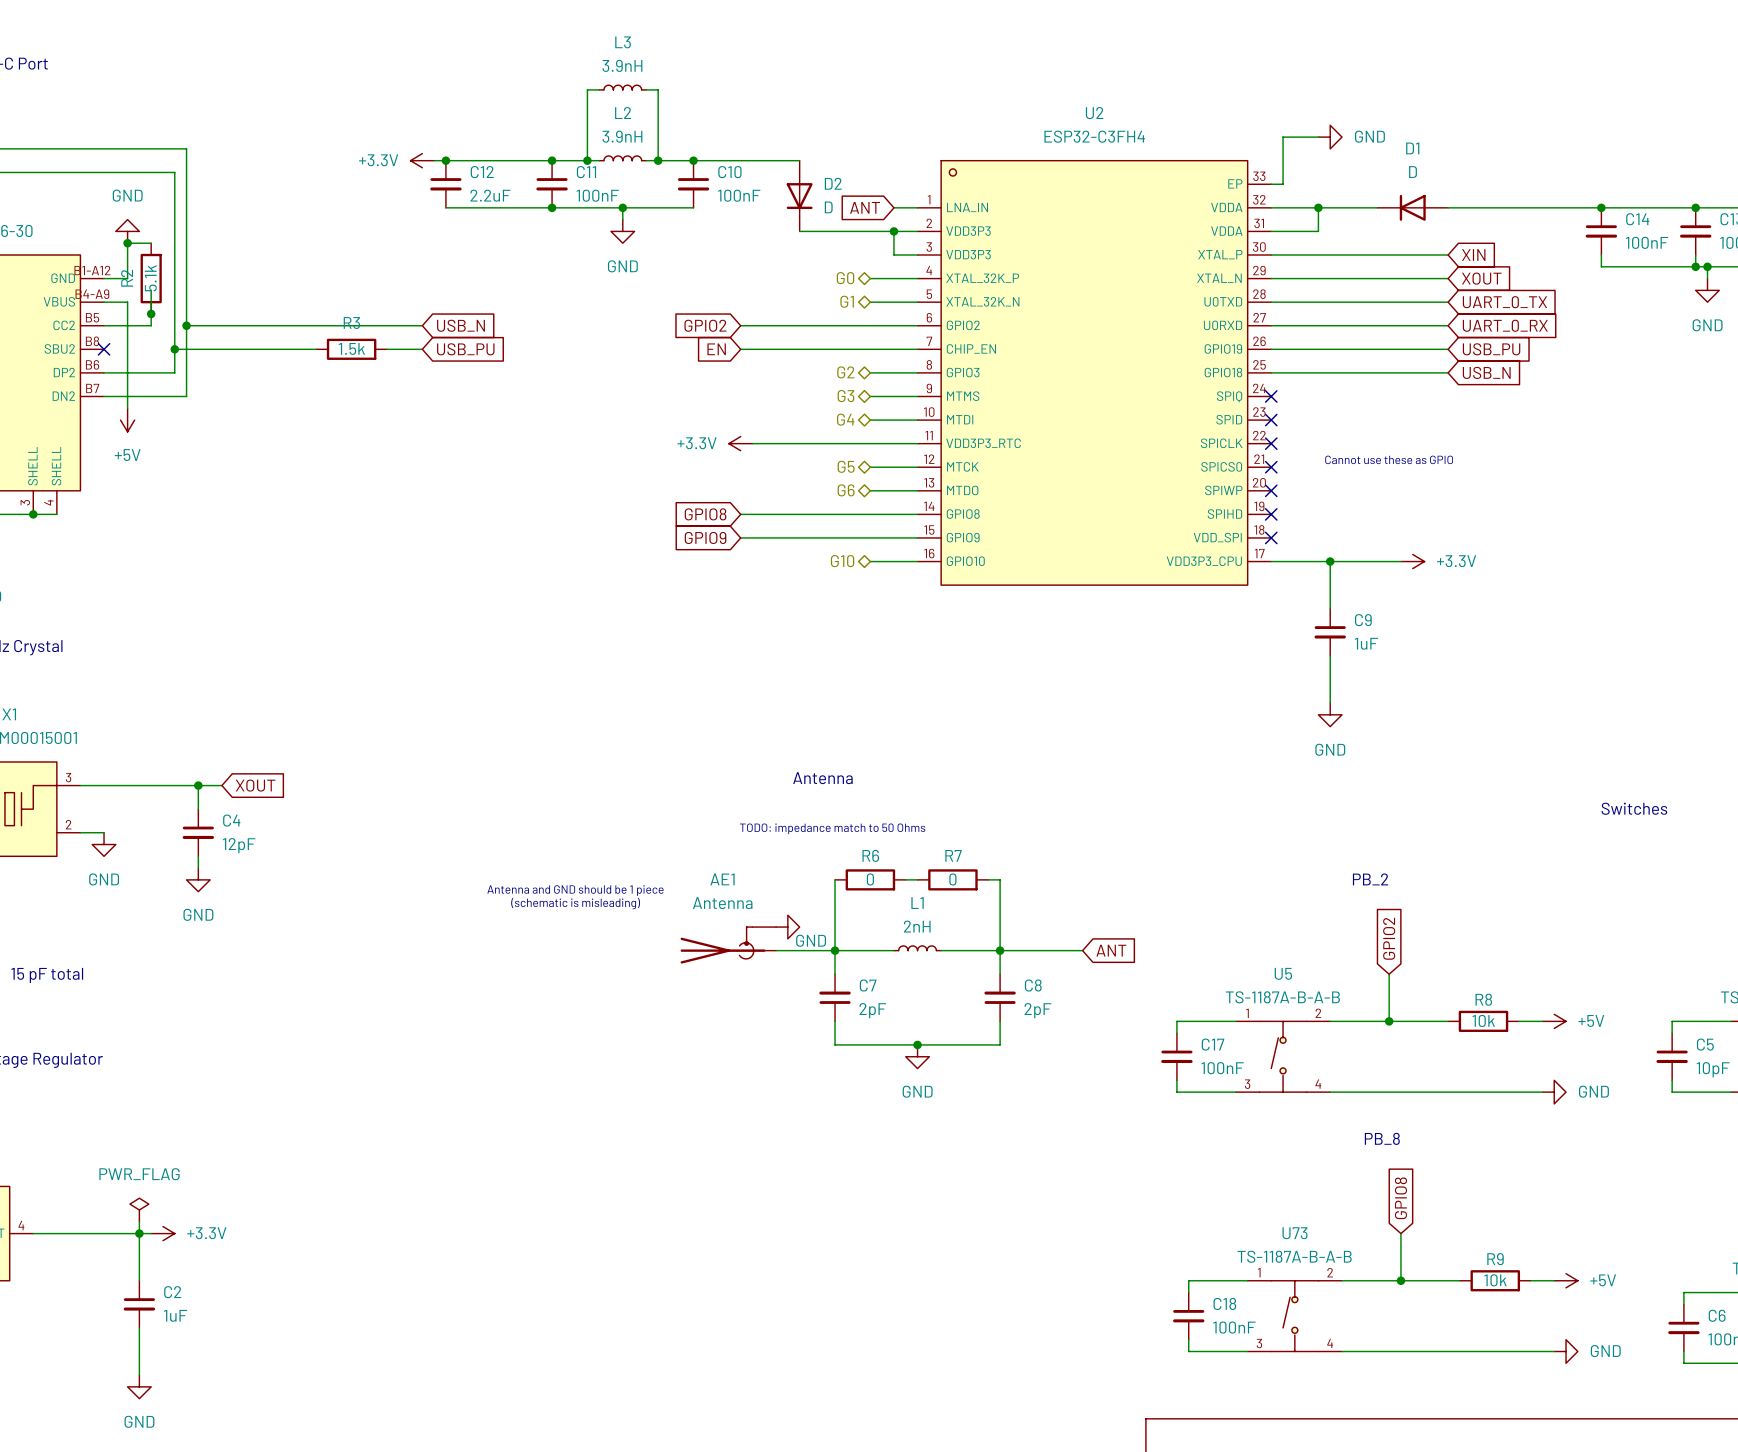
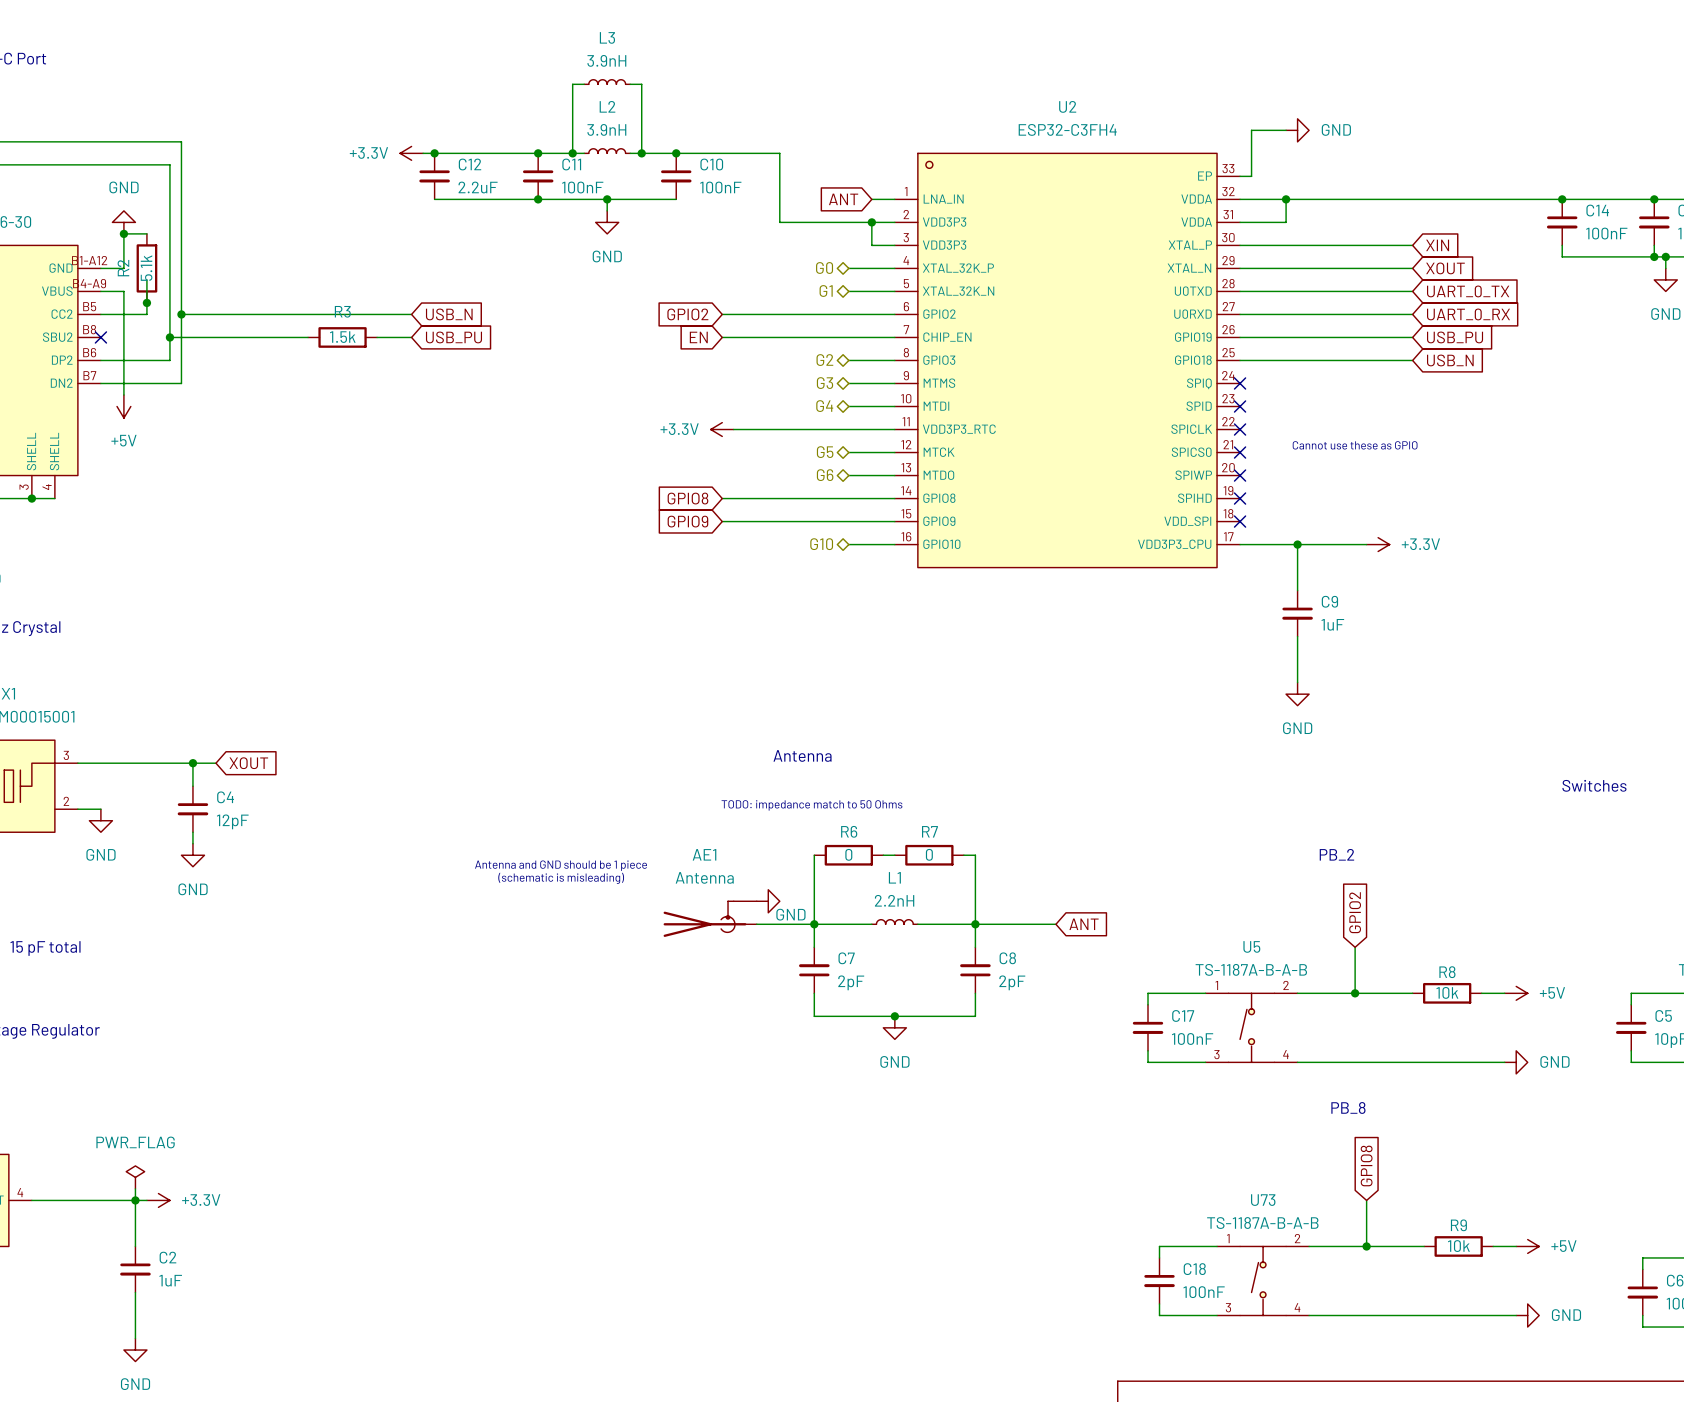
D2: D (799, 196) -> none
D1: D (1412, 207) -> none
L1 value: 2nH (917, 926) -> 2.2nH (894, 900)

